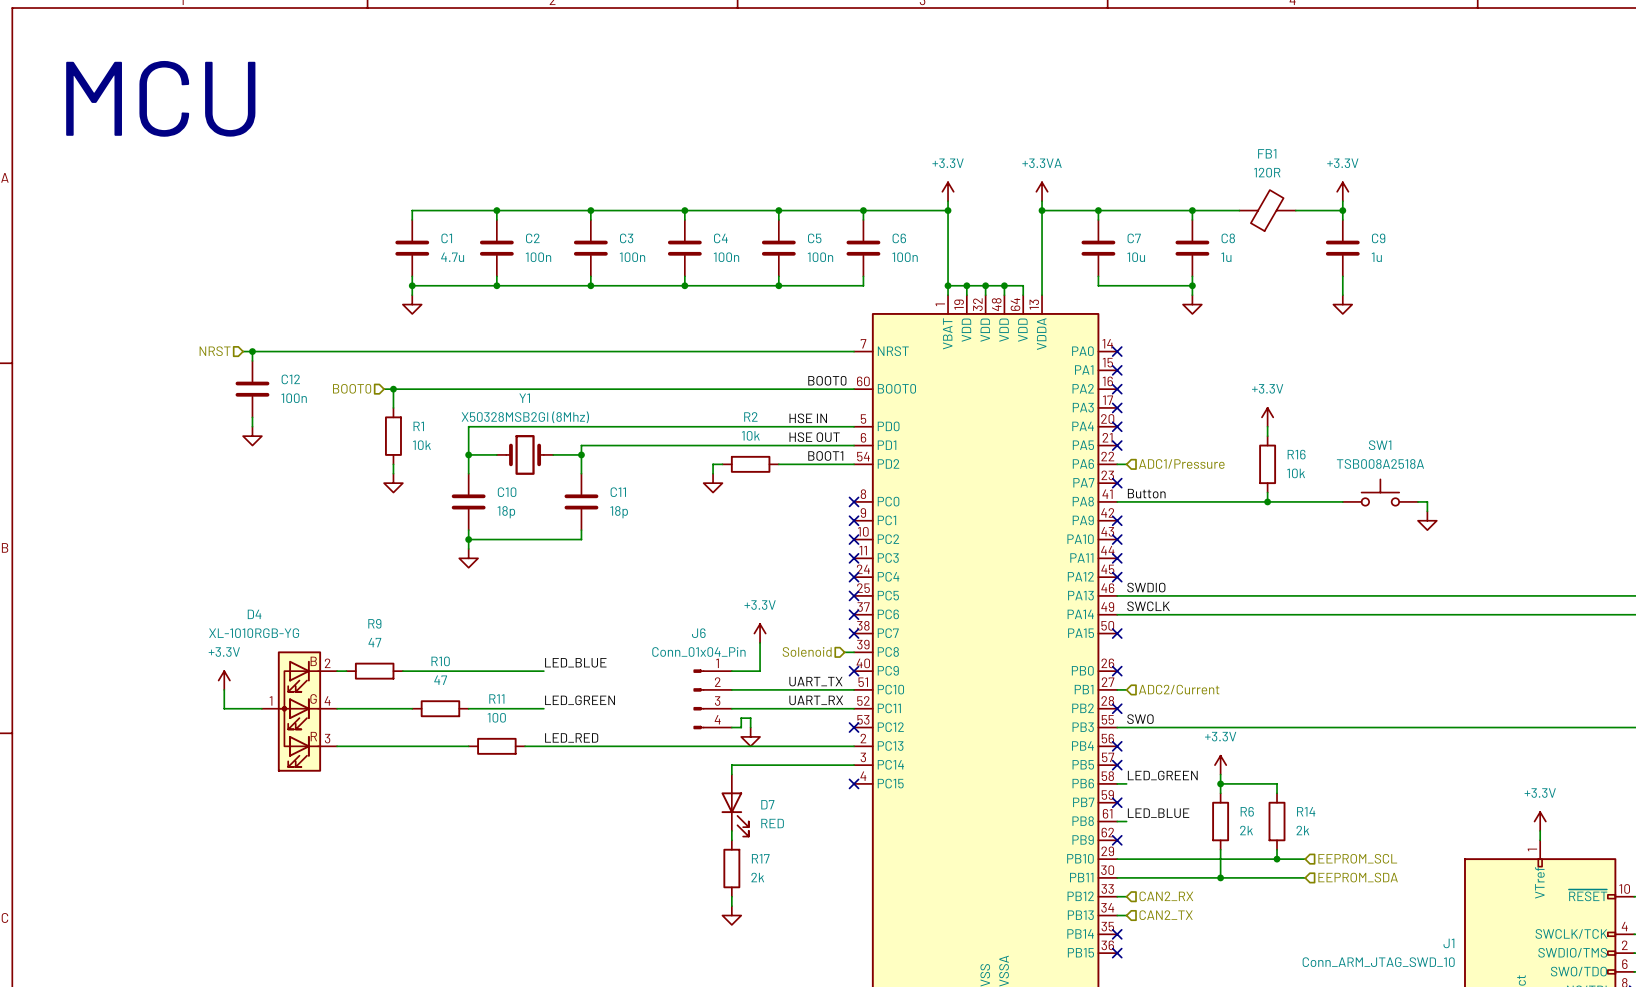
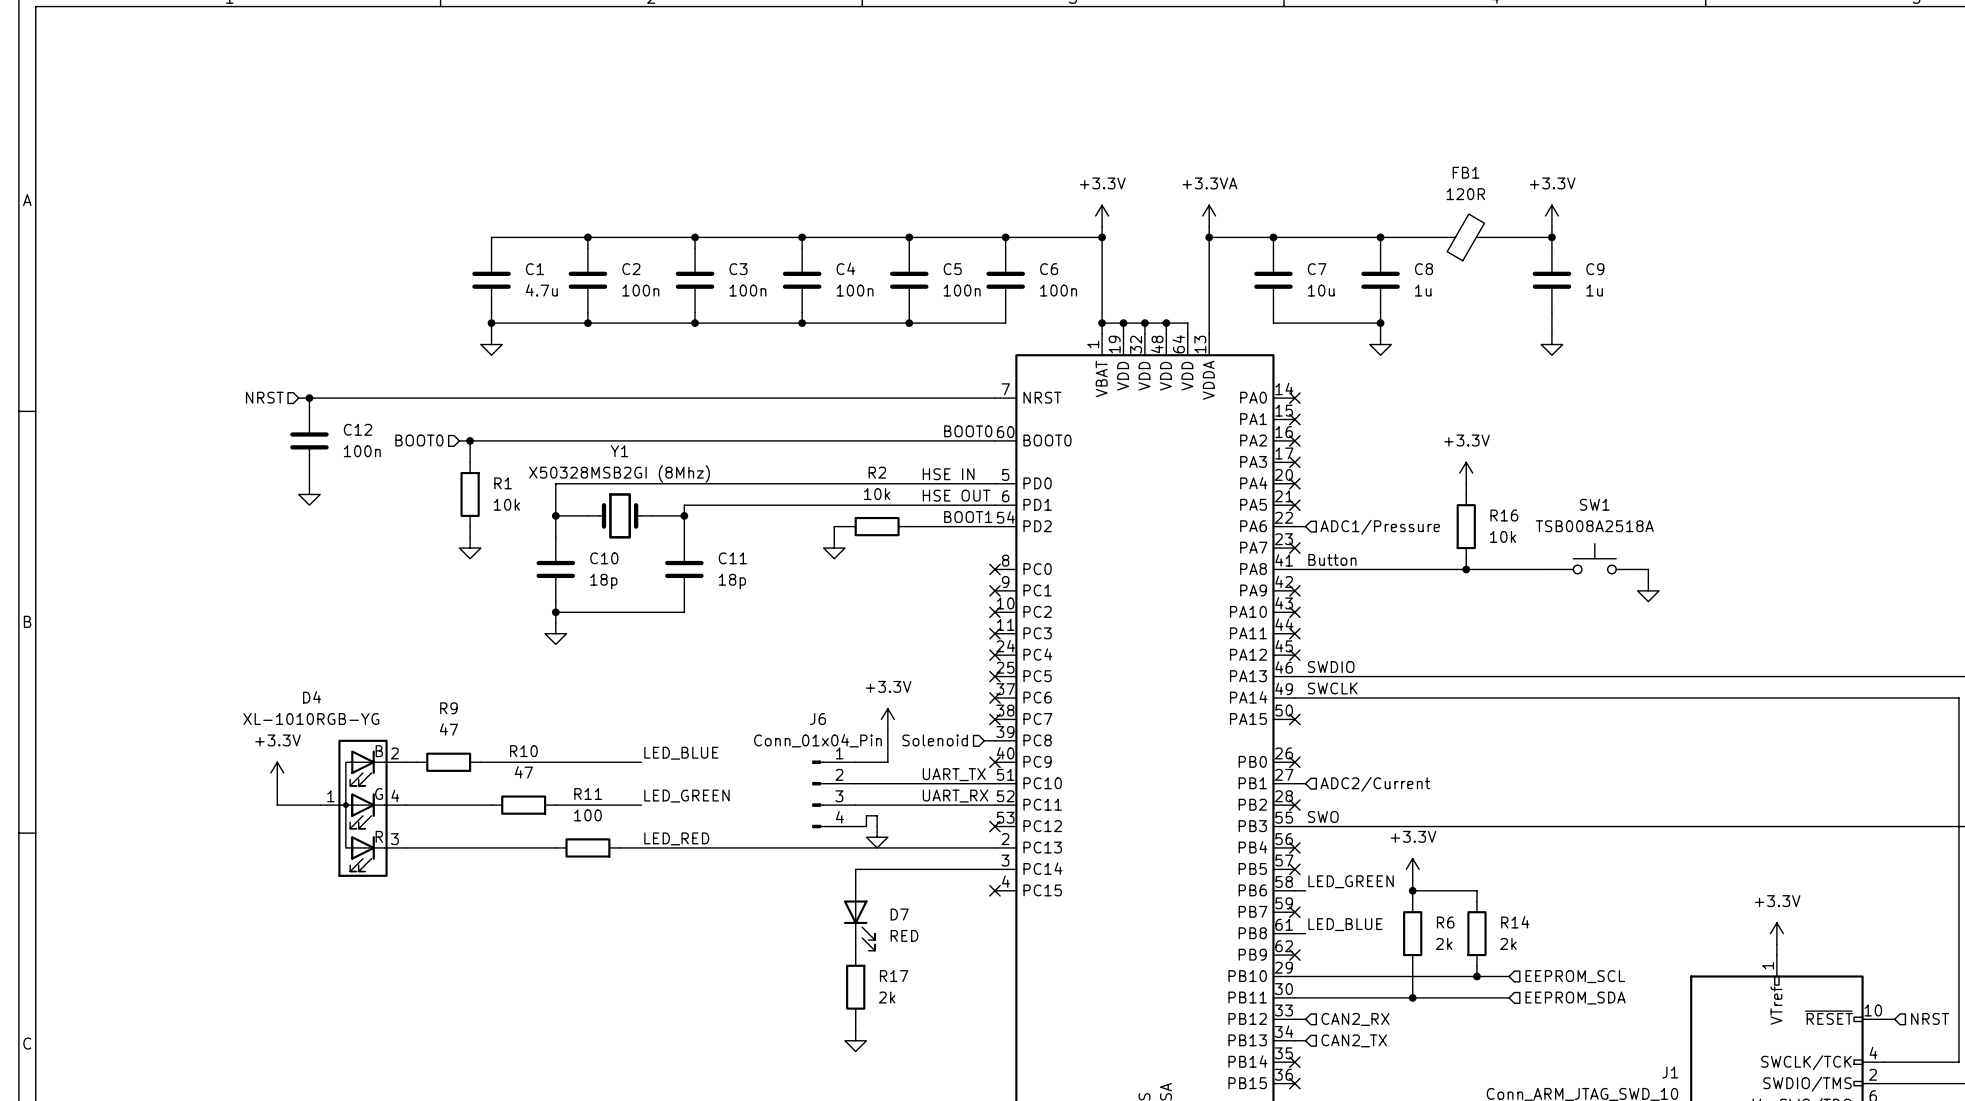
text: MCU (160, 98) -> none

